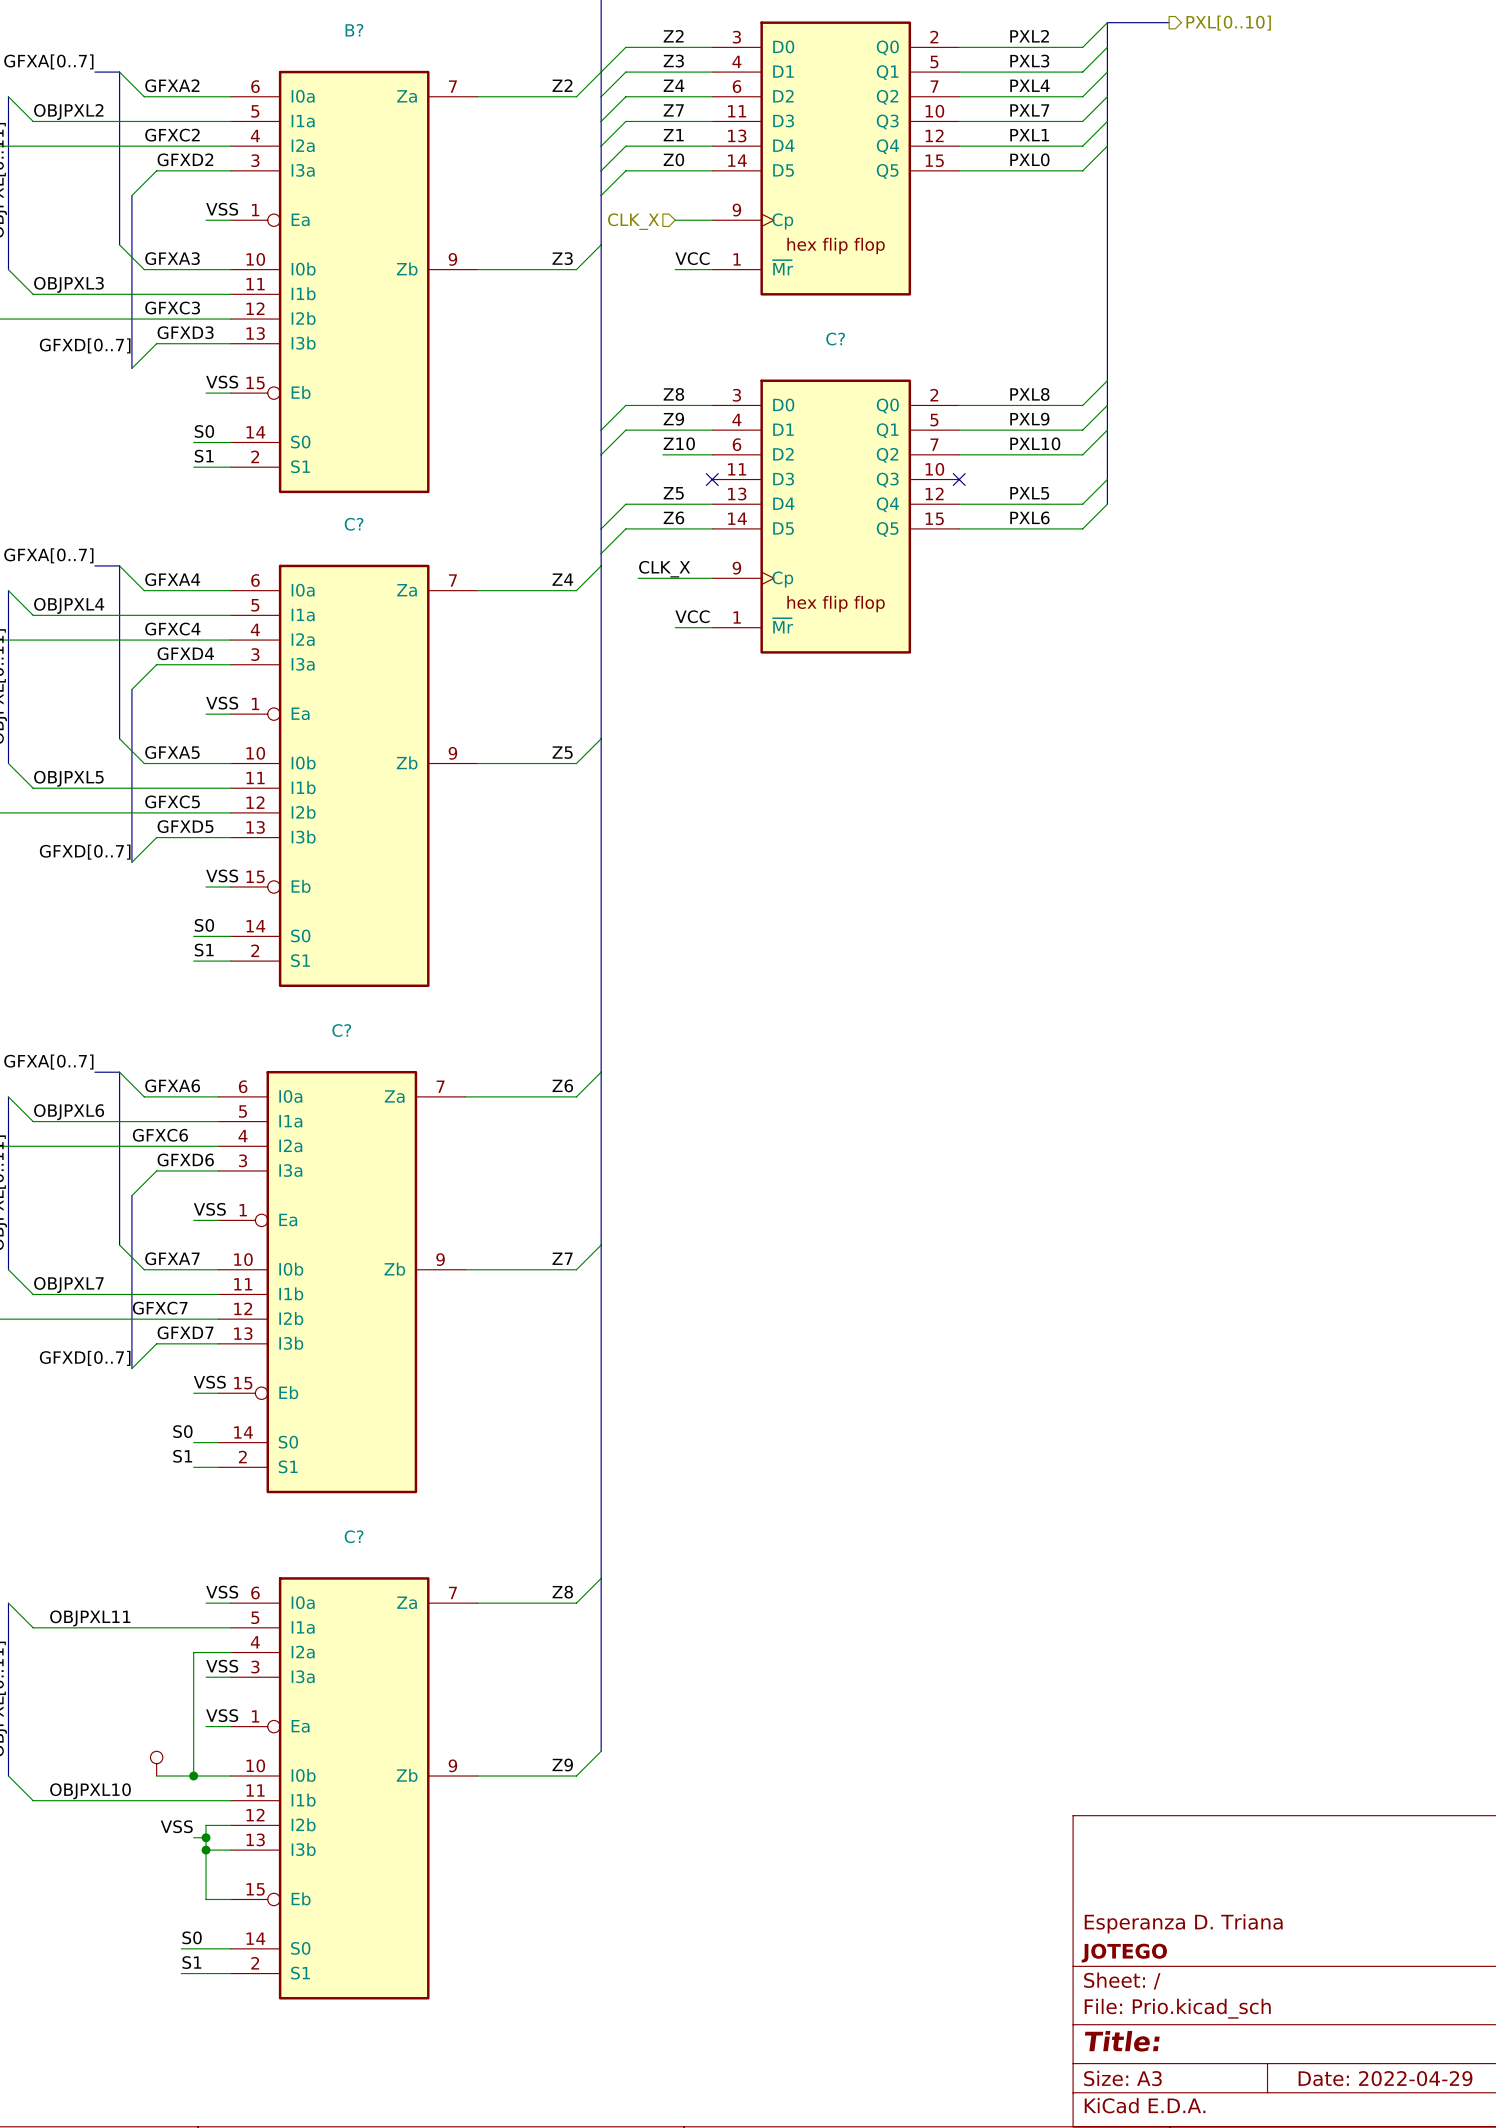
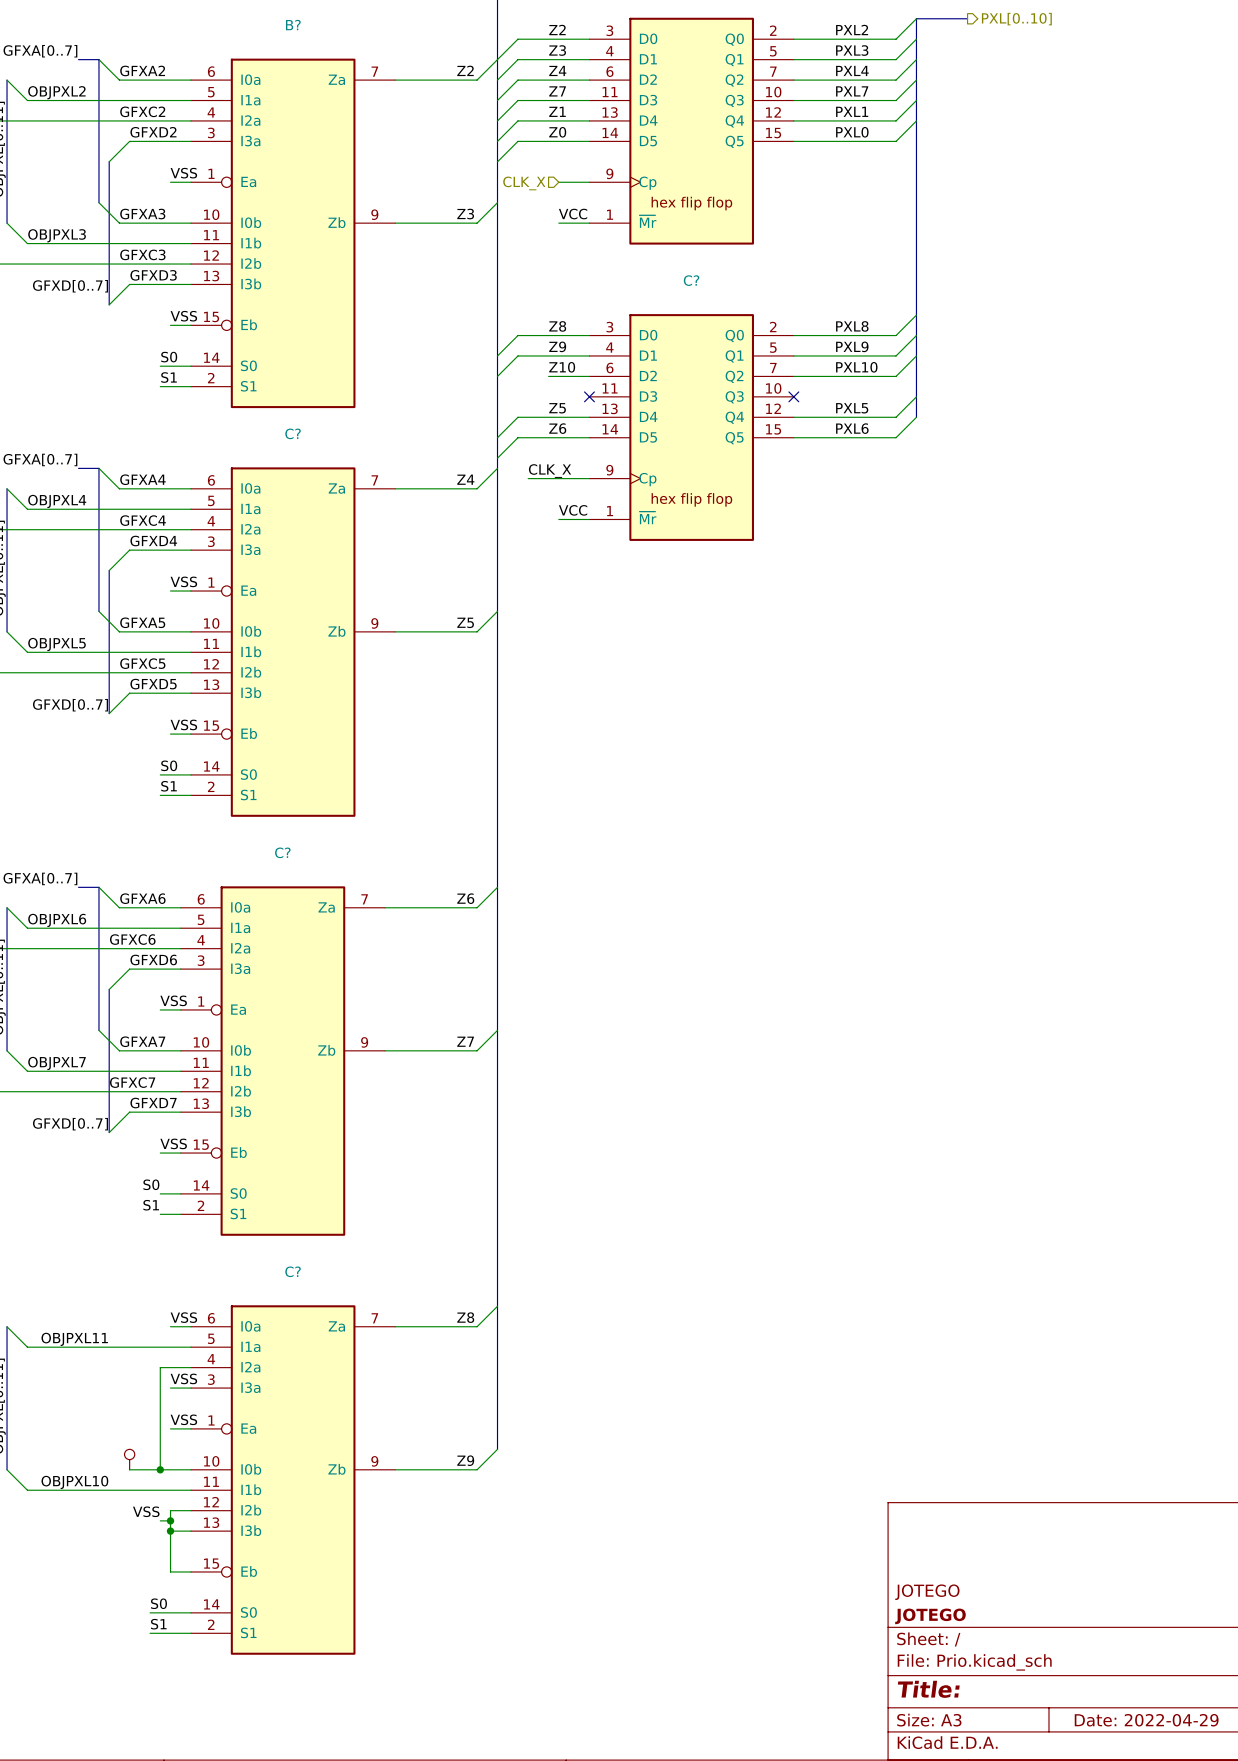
title block: Esperanza D. Triana (1183, 1923) -> JOTEGO (927, 1592)

